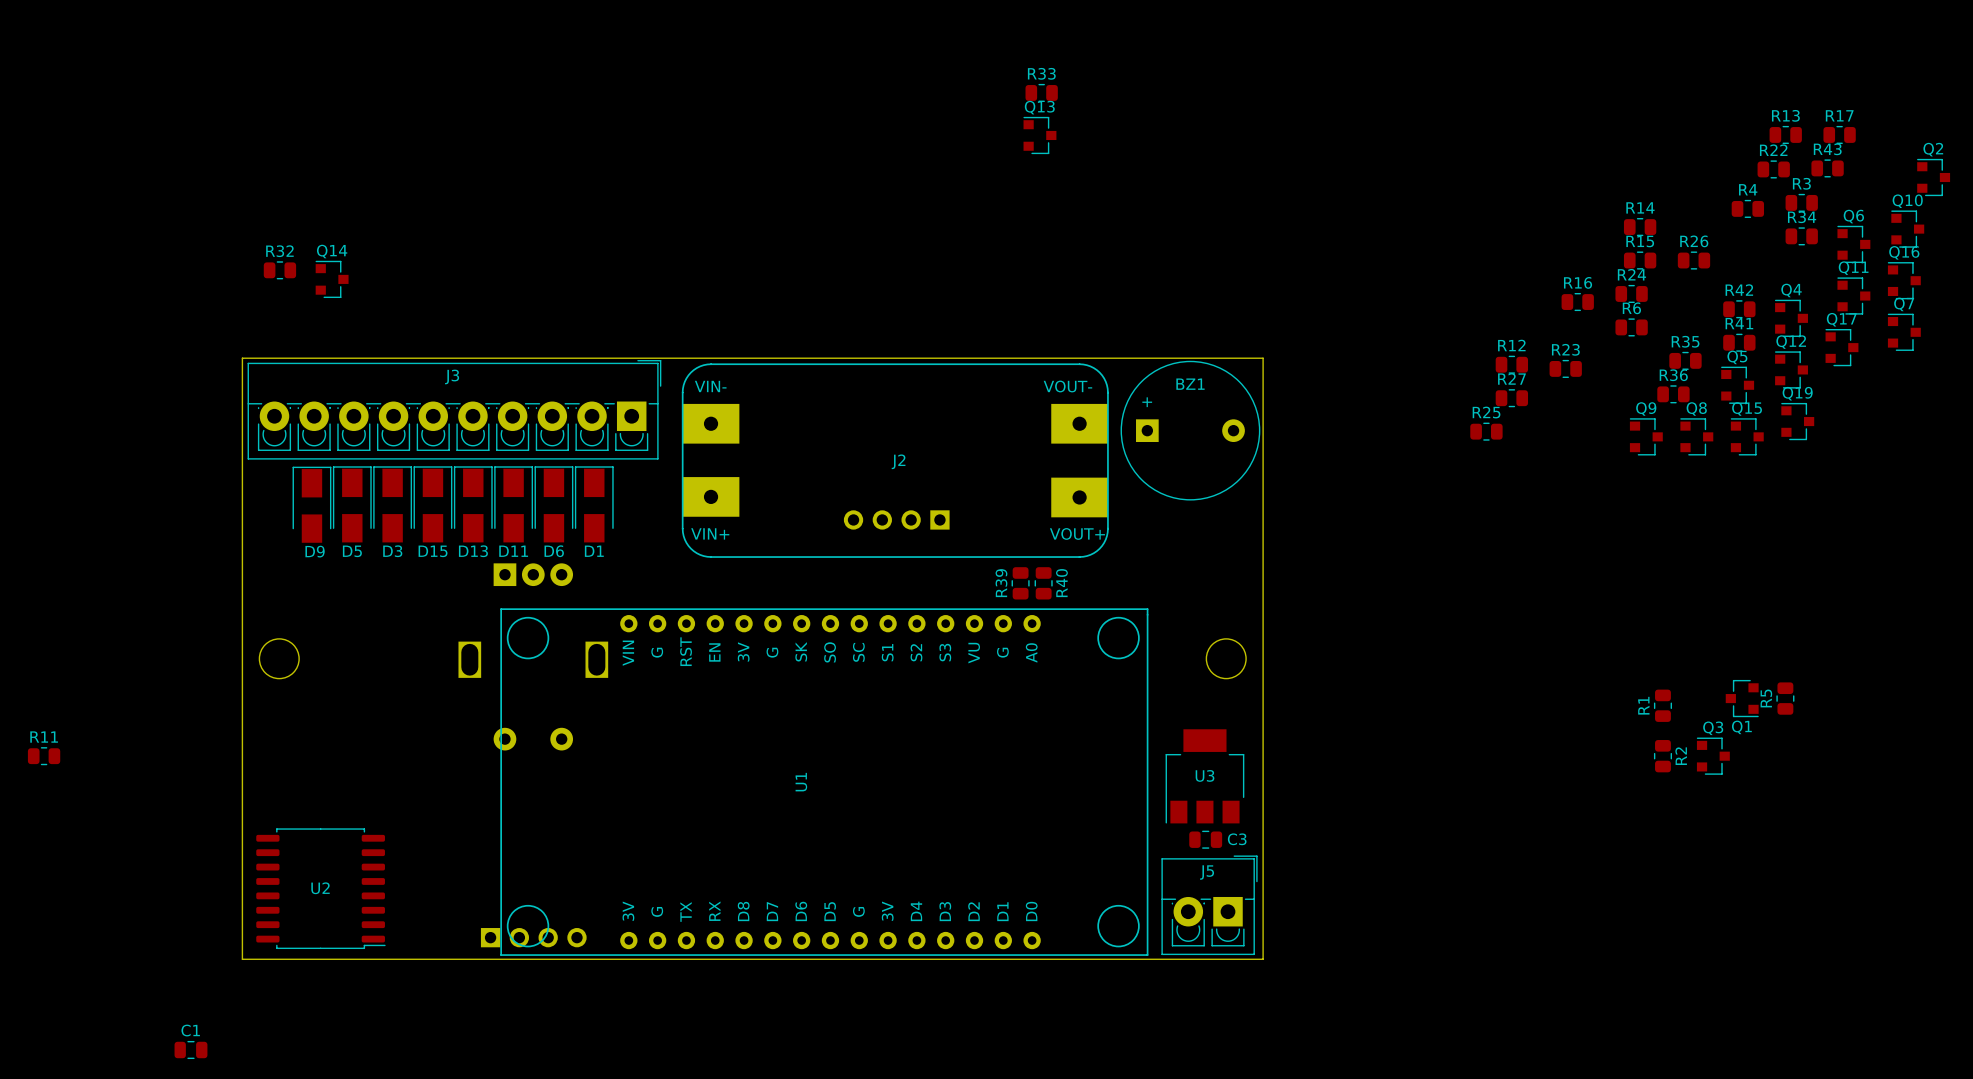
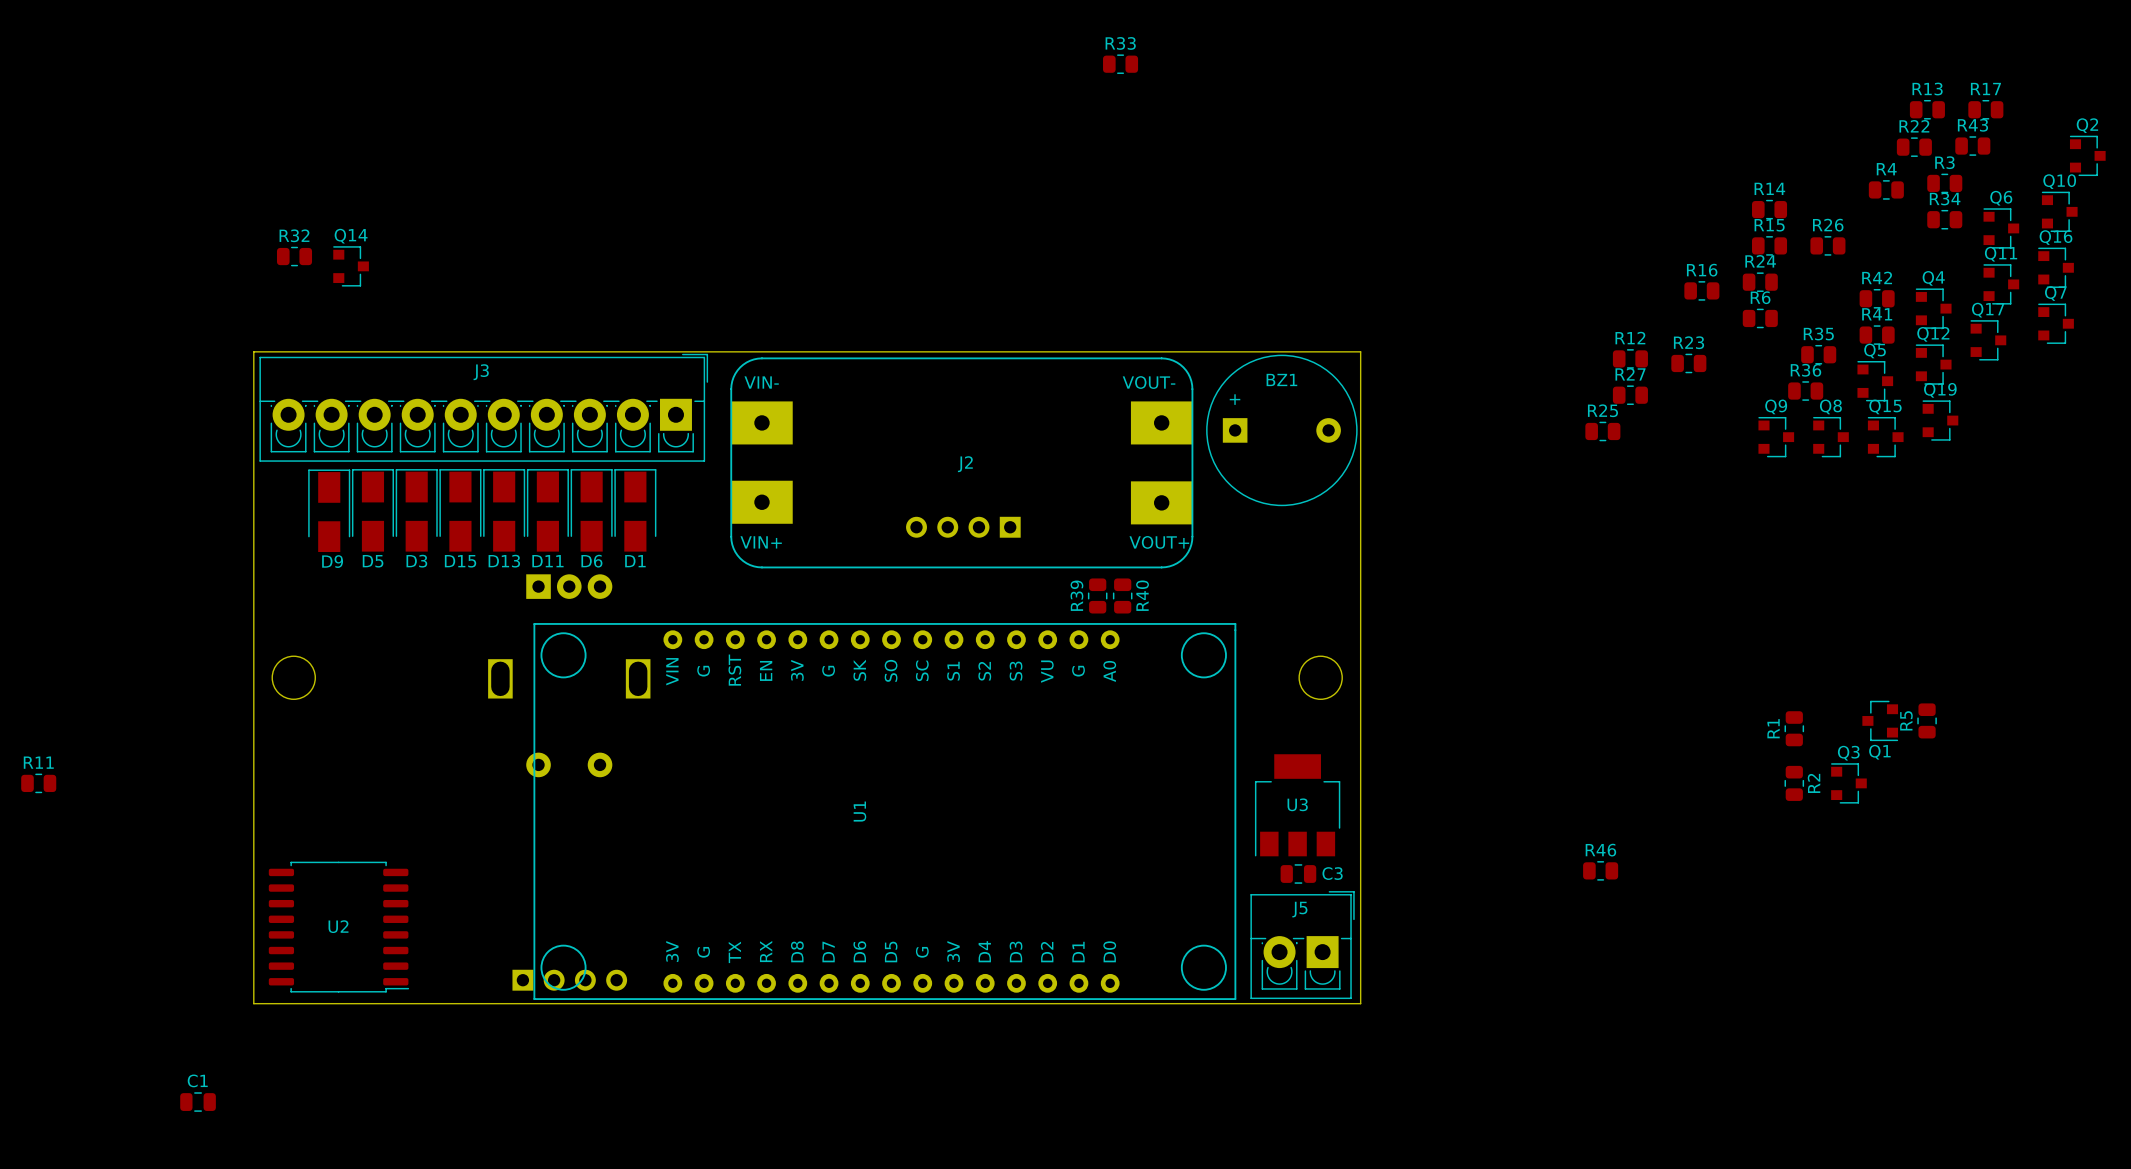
Q13: (1039, 135) -> none
R46: none -> (1600, 870)

